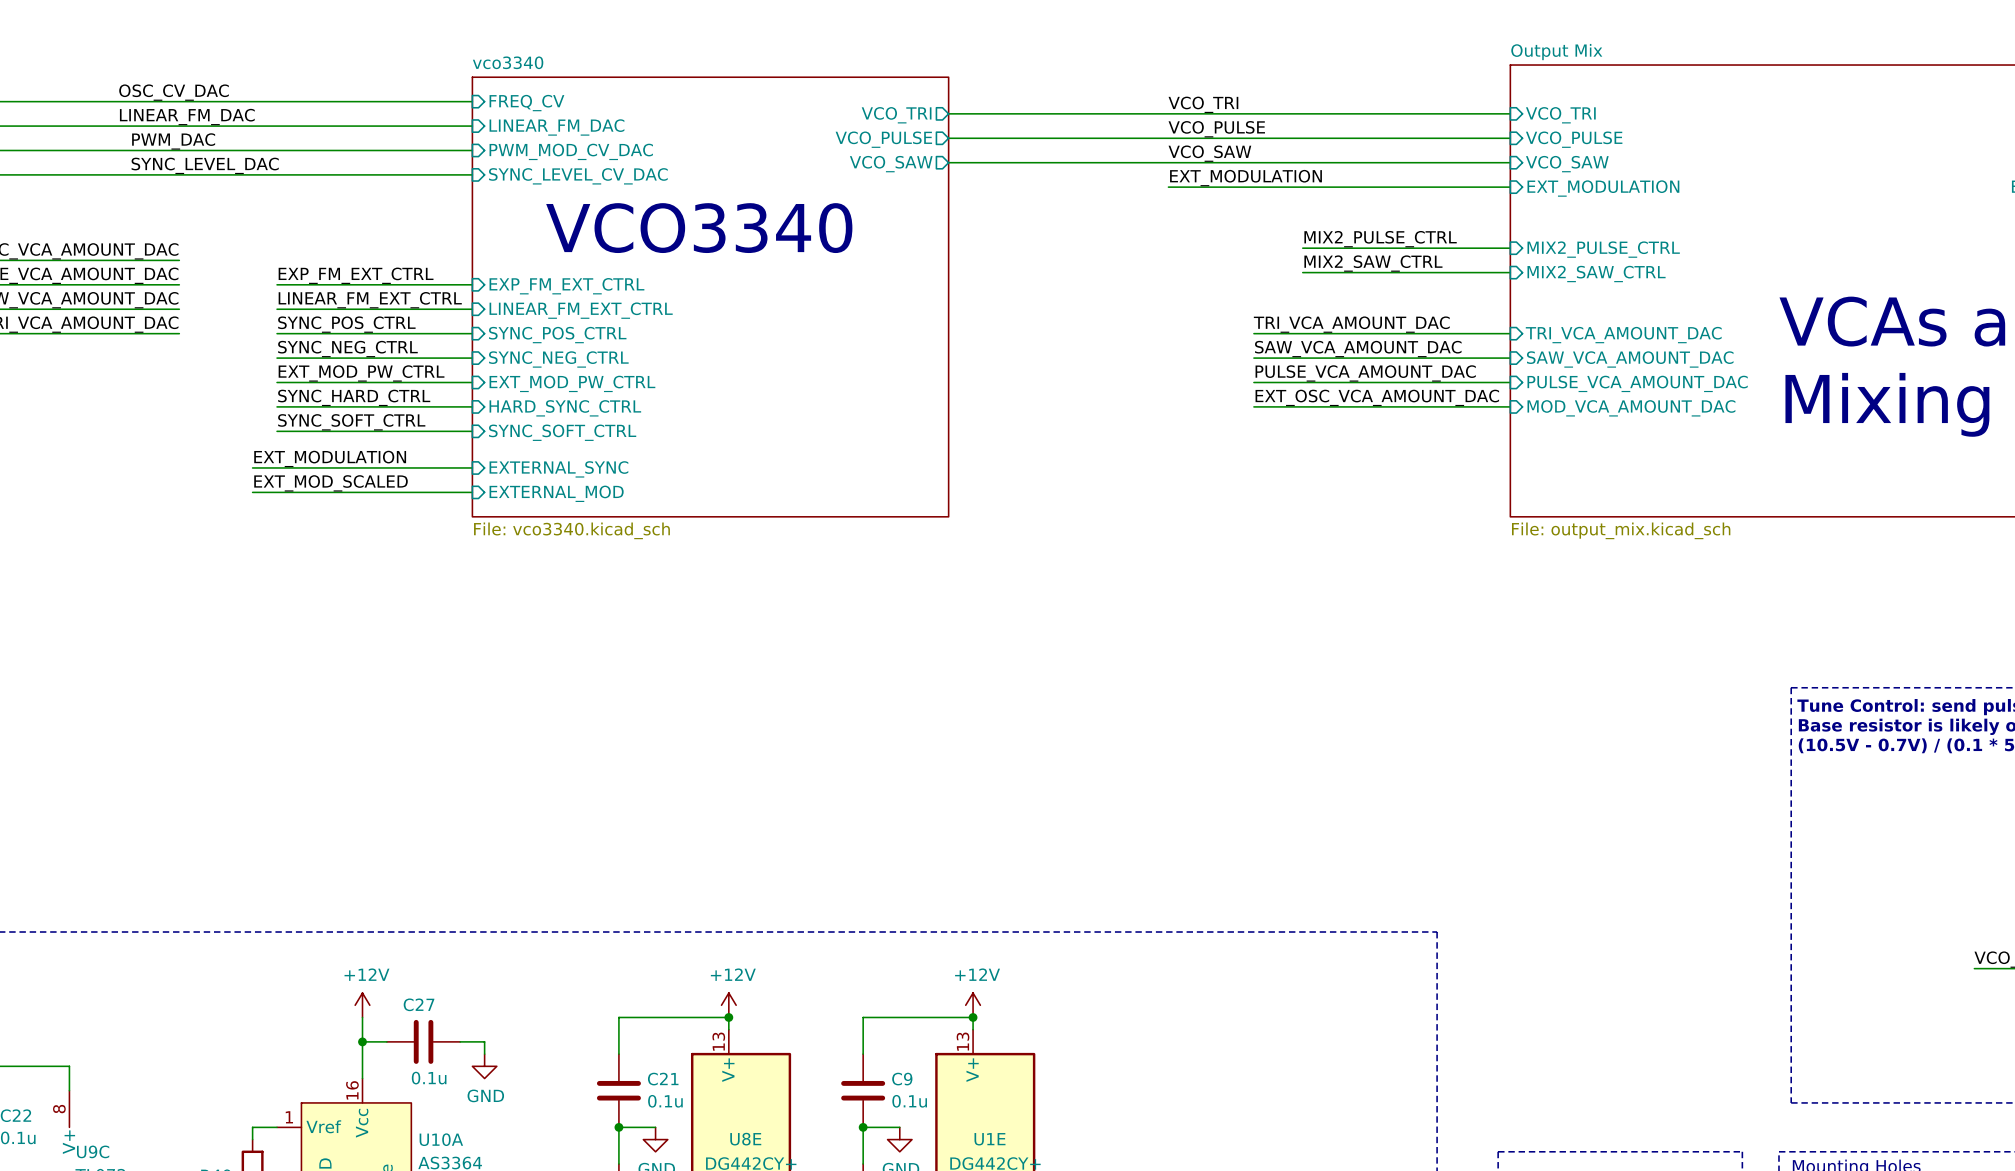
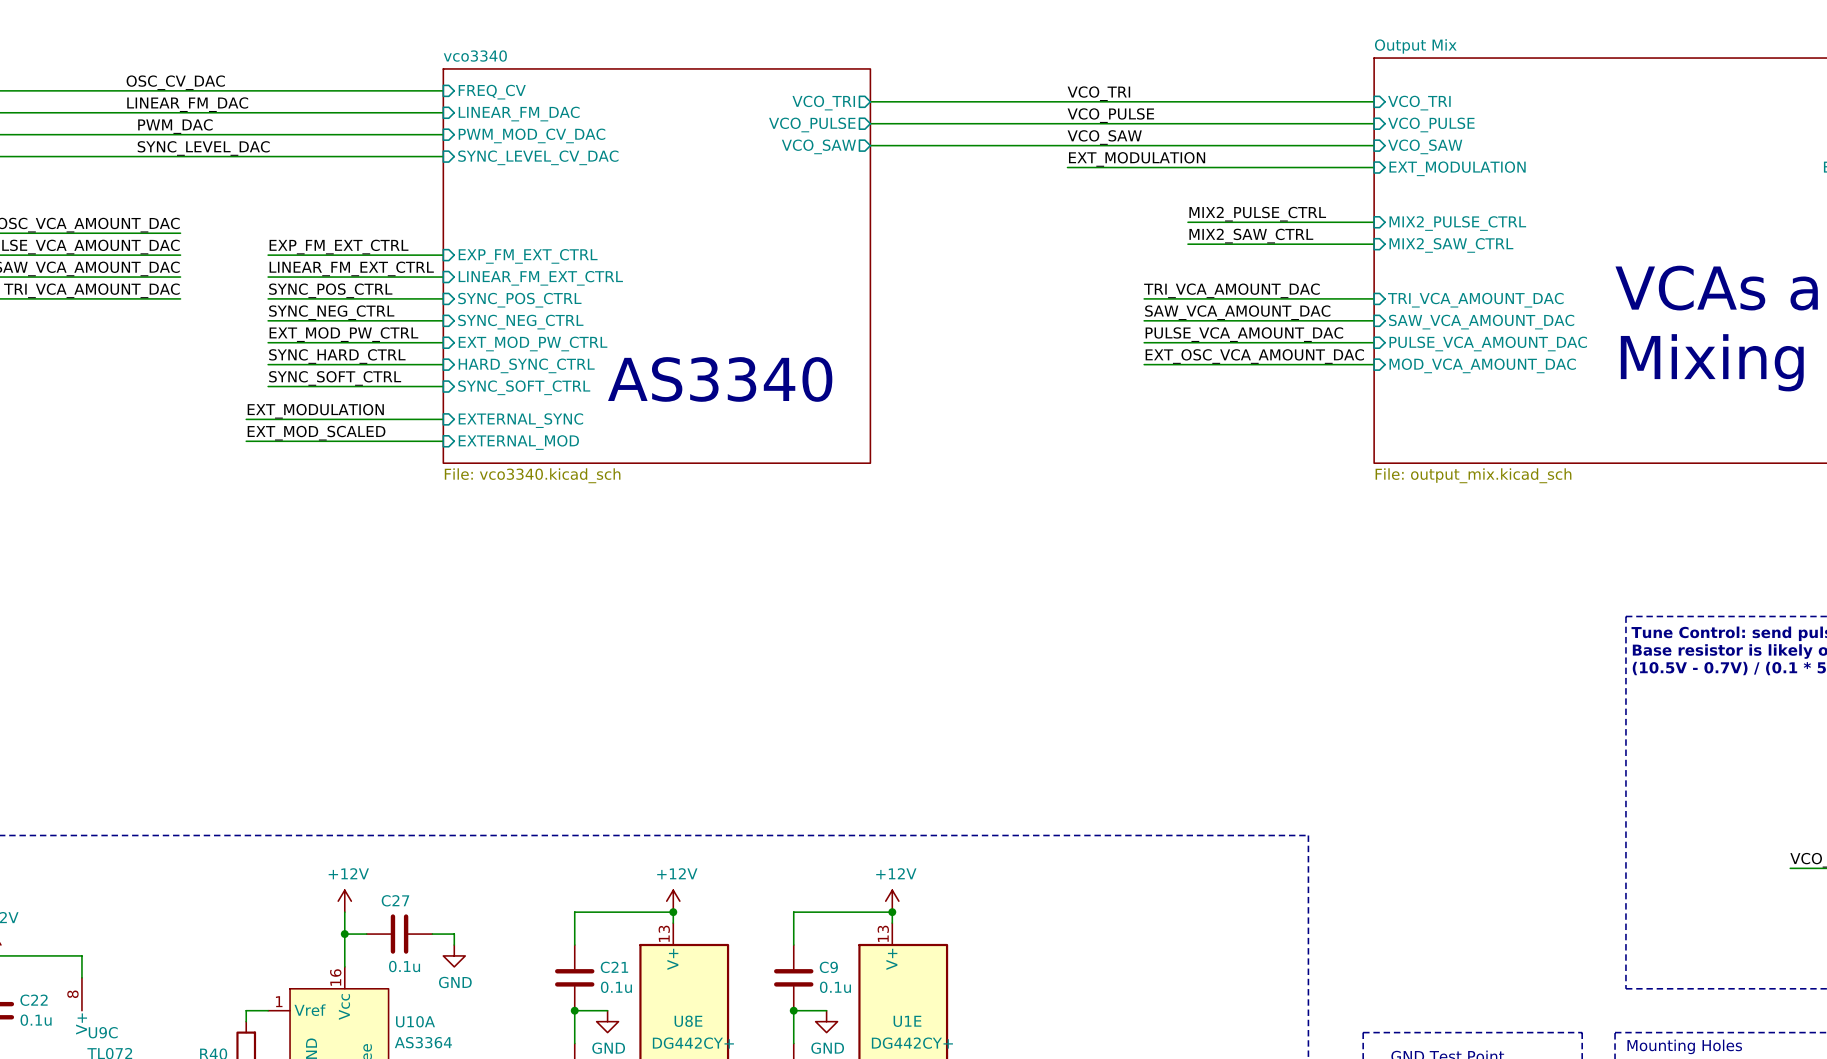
text: VCO3340 (699, 228) -> none
text: none -> AS3340 (720, 379)

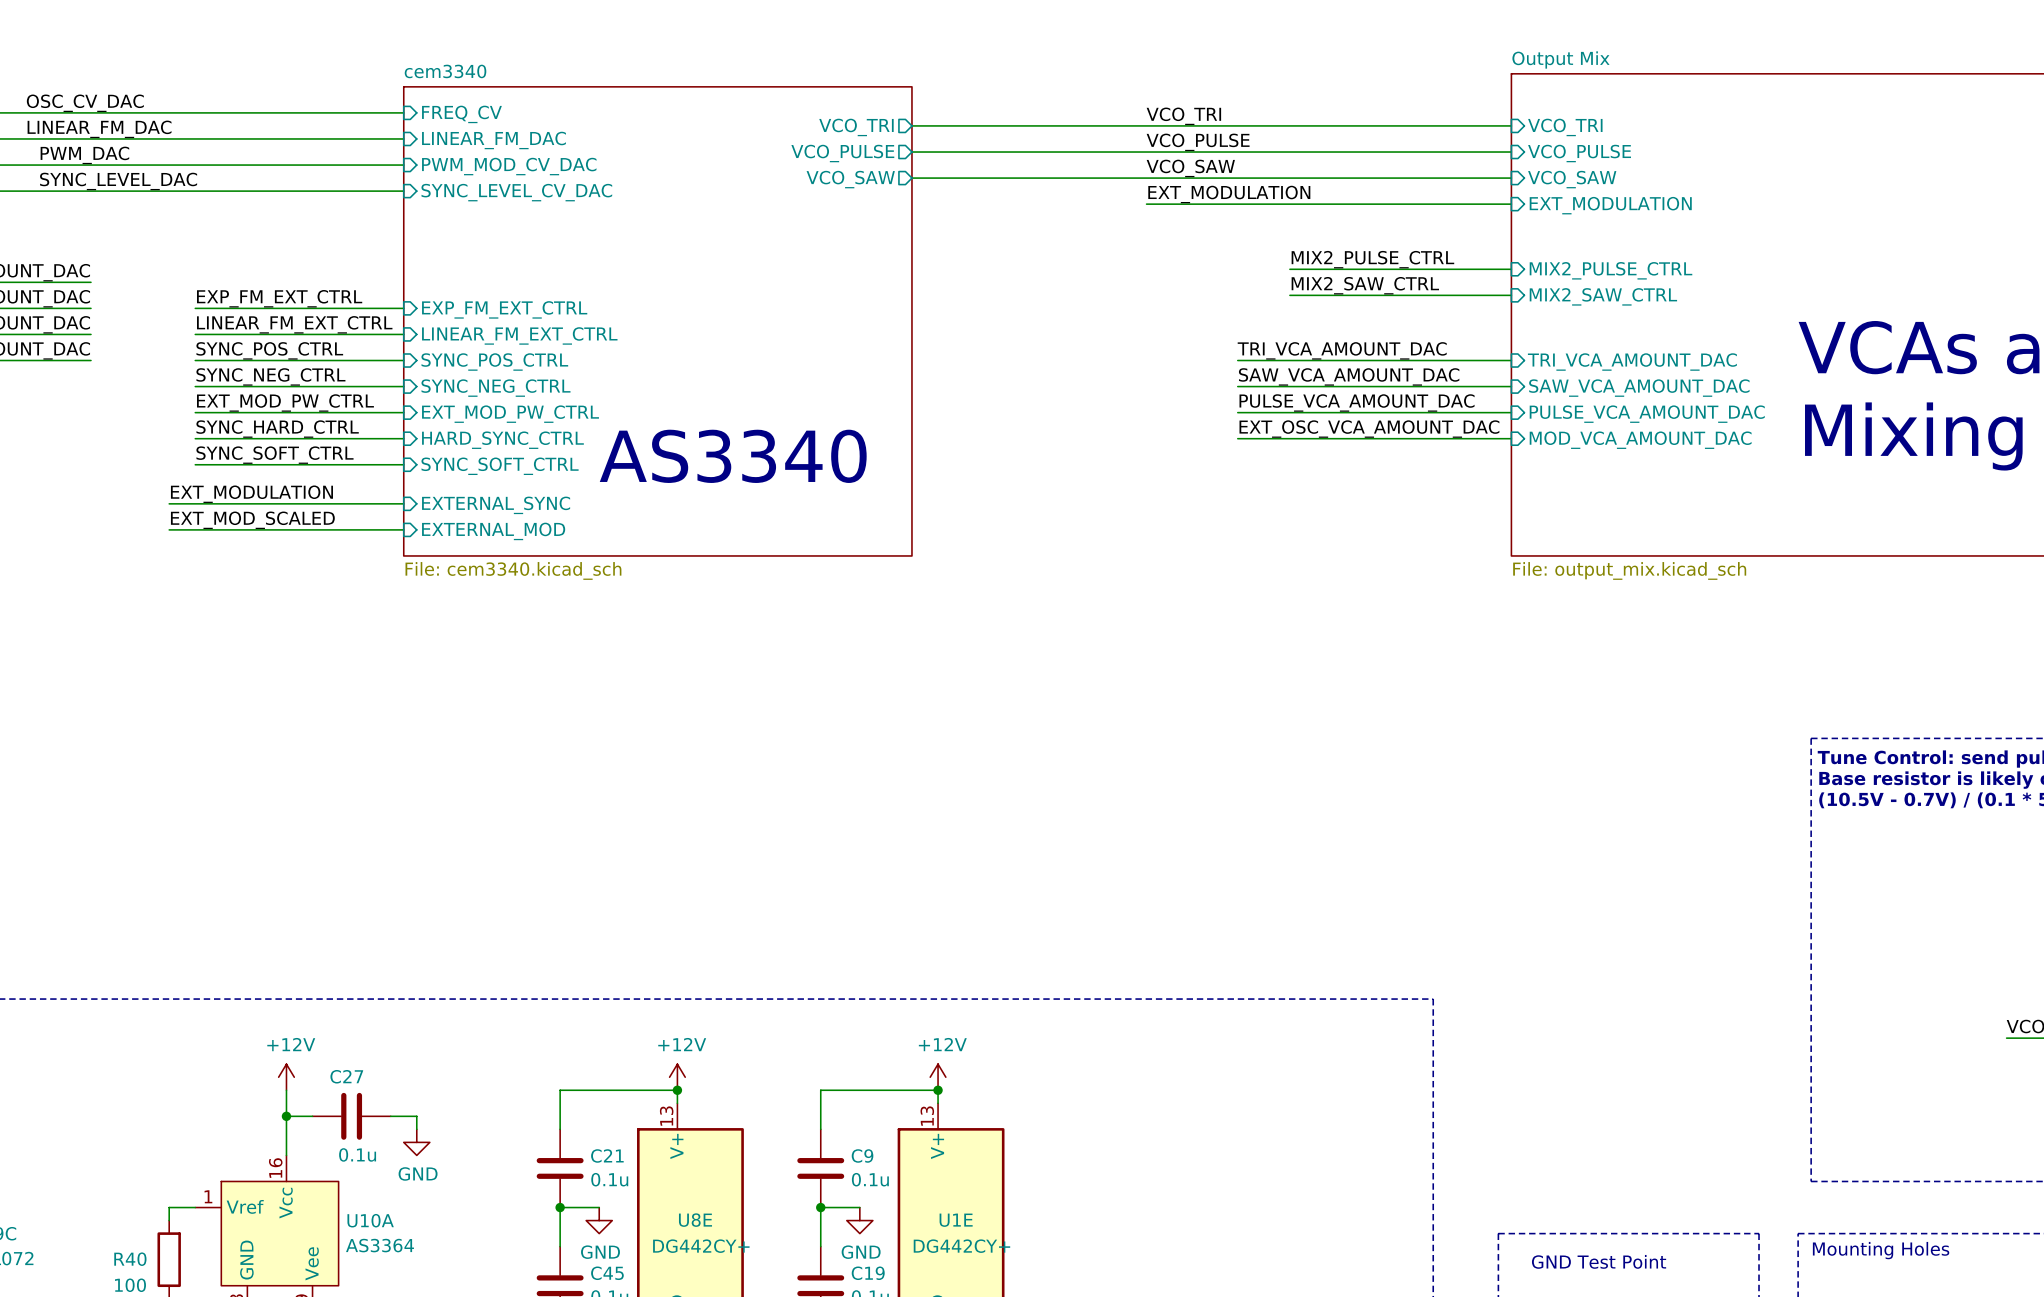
sheet vco3340 name: vco3340 (475, 56) -> cem3340 (445, 71)
sheet vco3340 value: File: vco3340.kicad_sch (532, 475) -> File: cem3340.kicad_sch (513, 570)

